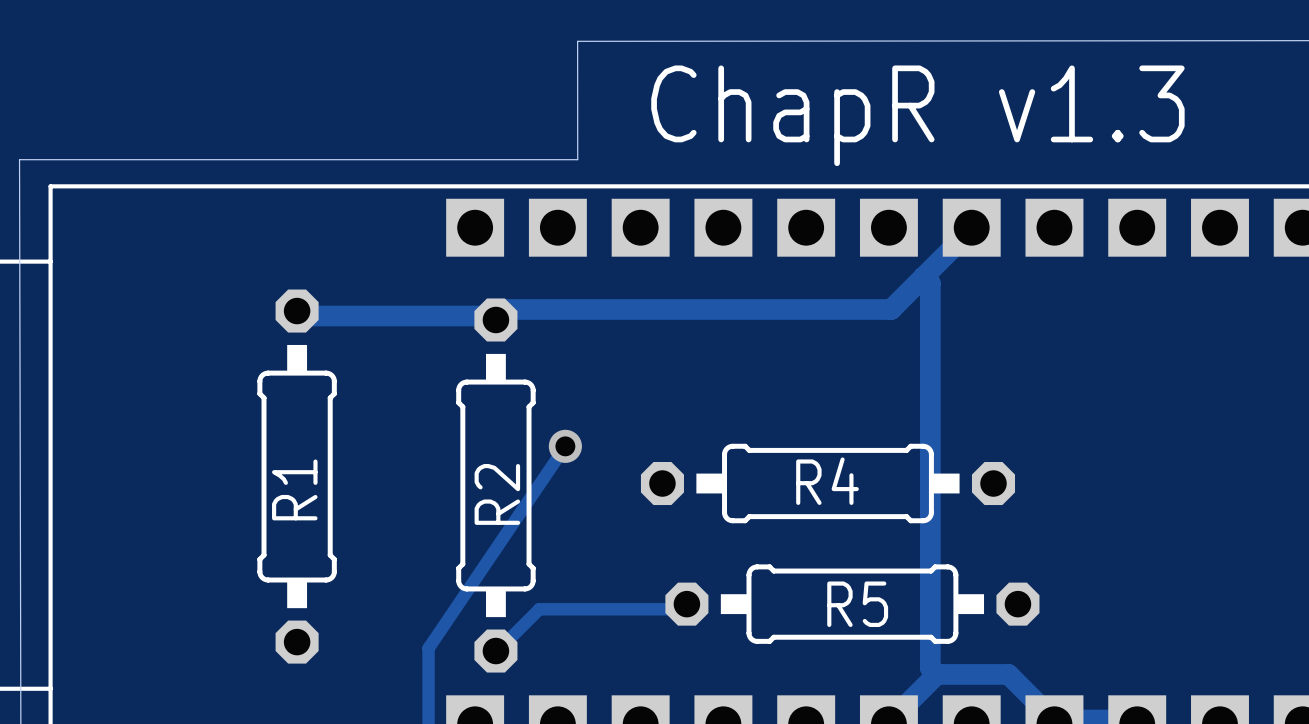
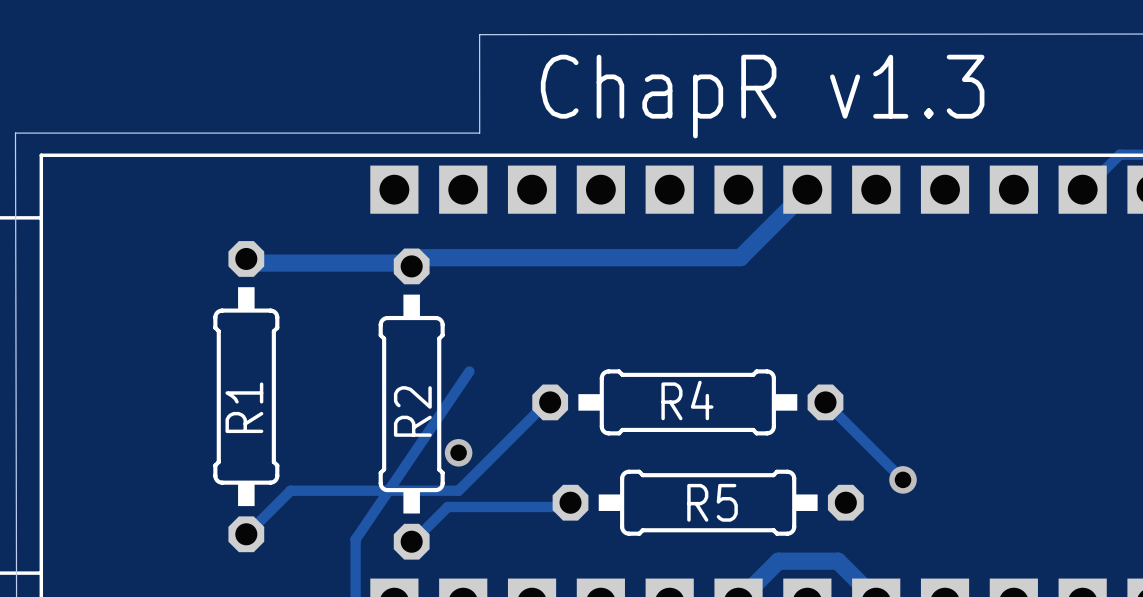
track: (923, 276) (930, 283) (930, 667) (936, 674) -> none
via position: (565, 446) -> (458, 452)
track: none -> (550, 402) (545, 404) (458, 490) (290, 490) (246, 534)
track: none -> (825, 402) (903, 479)
via: none -> (903, 479)

